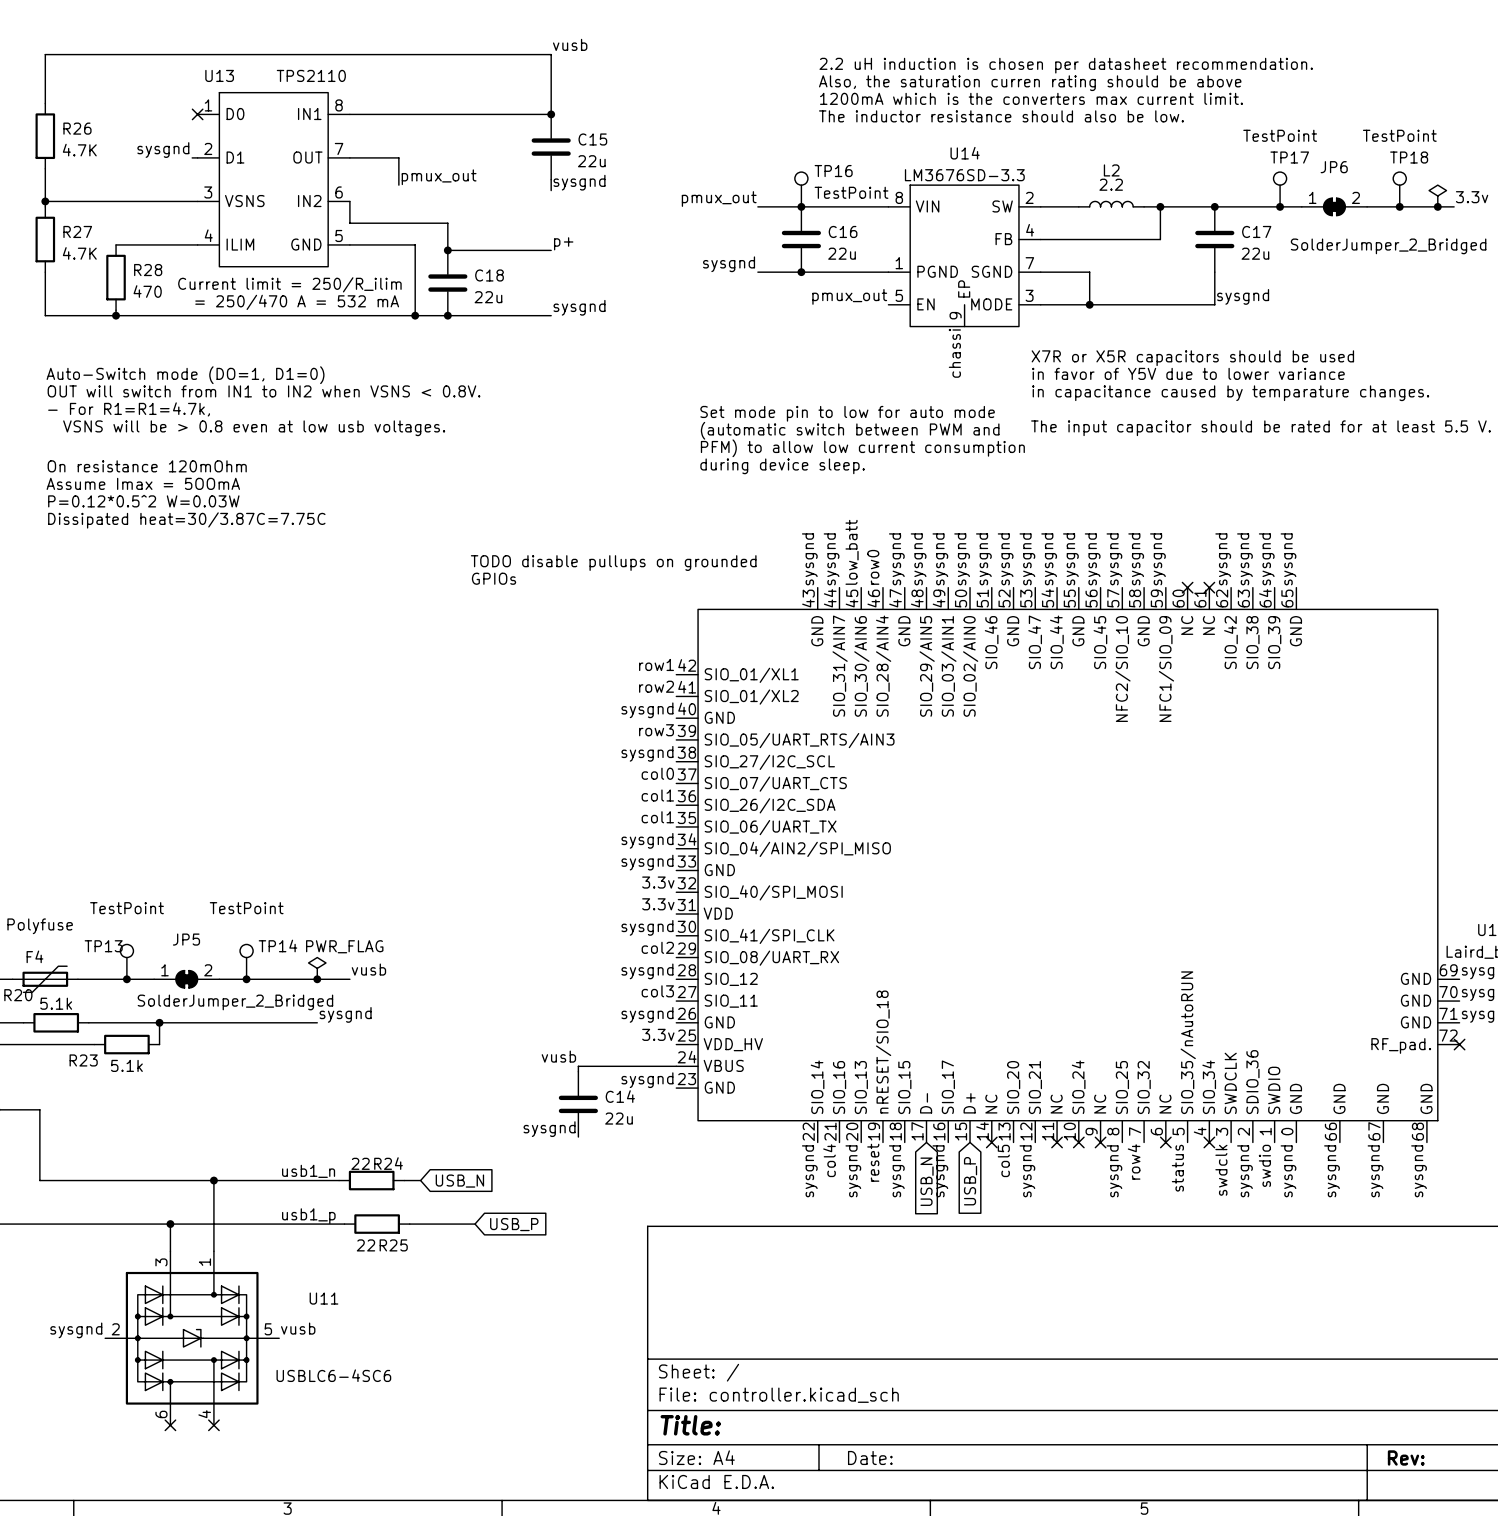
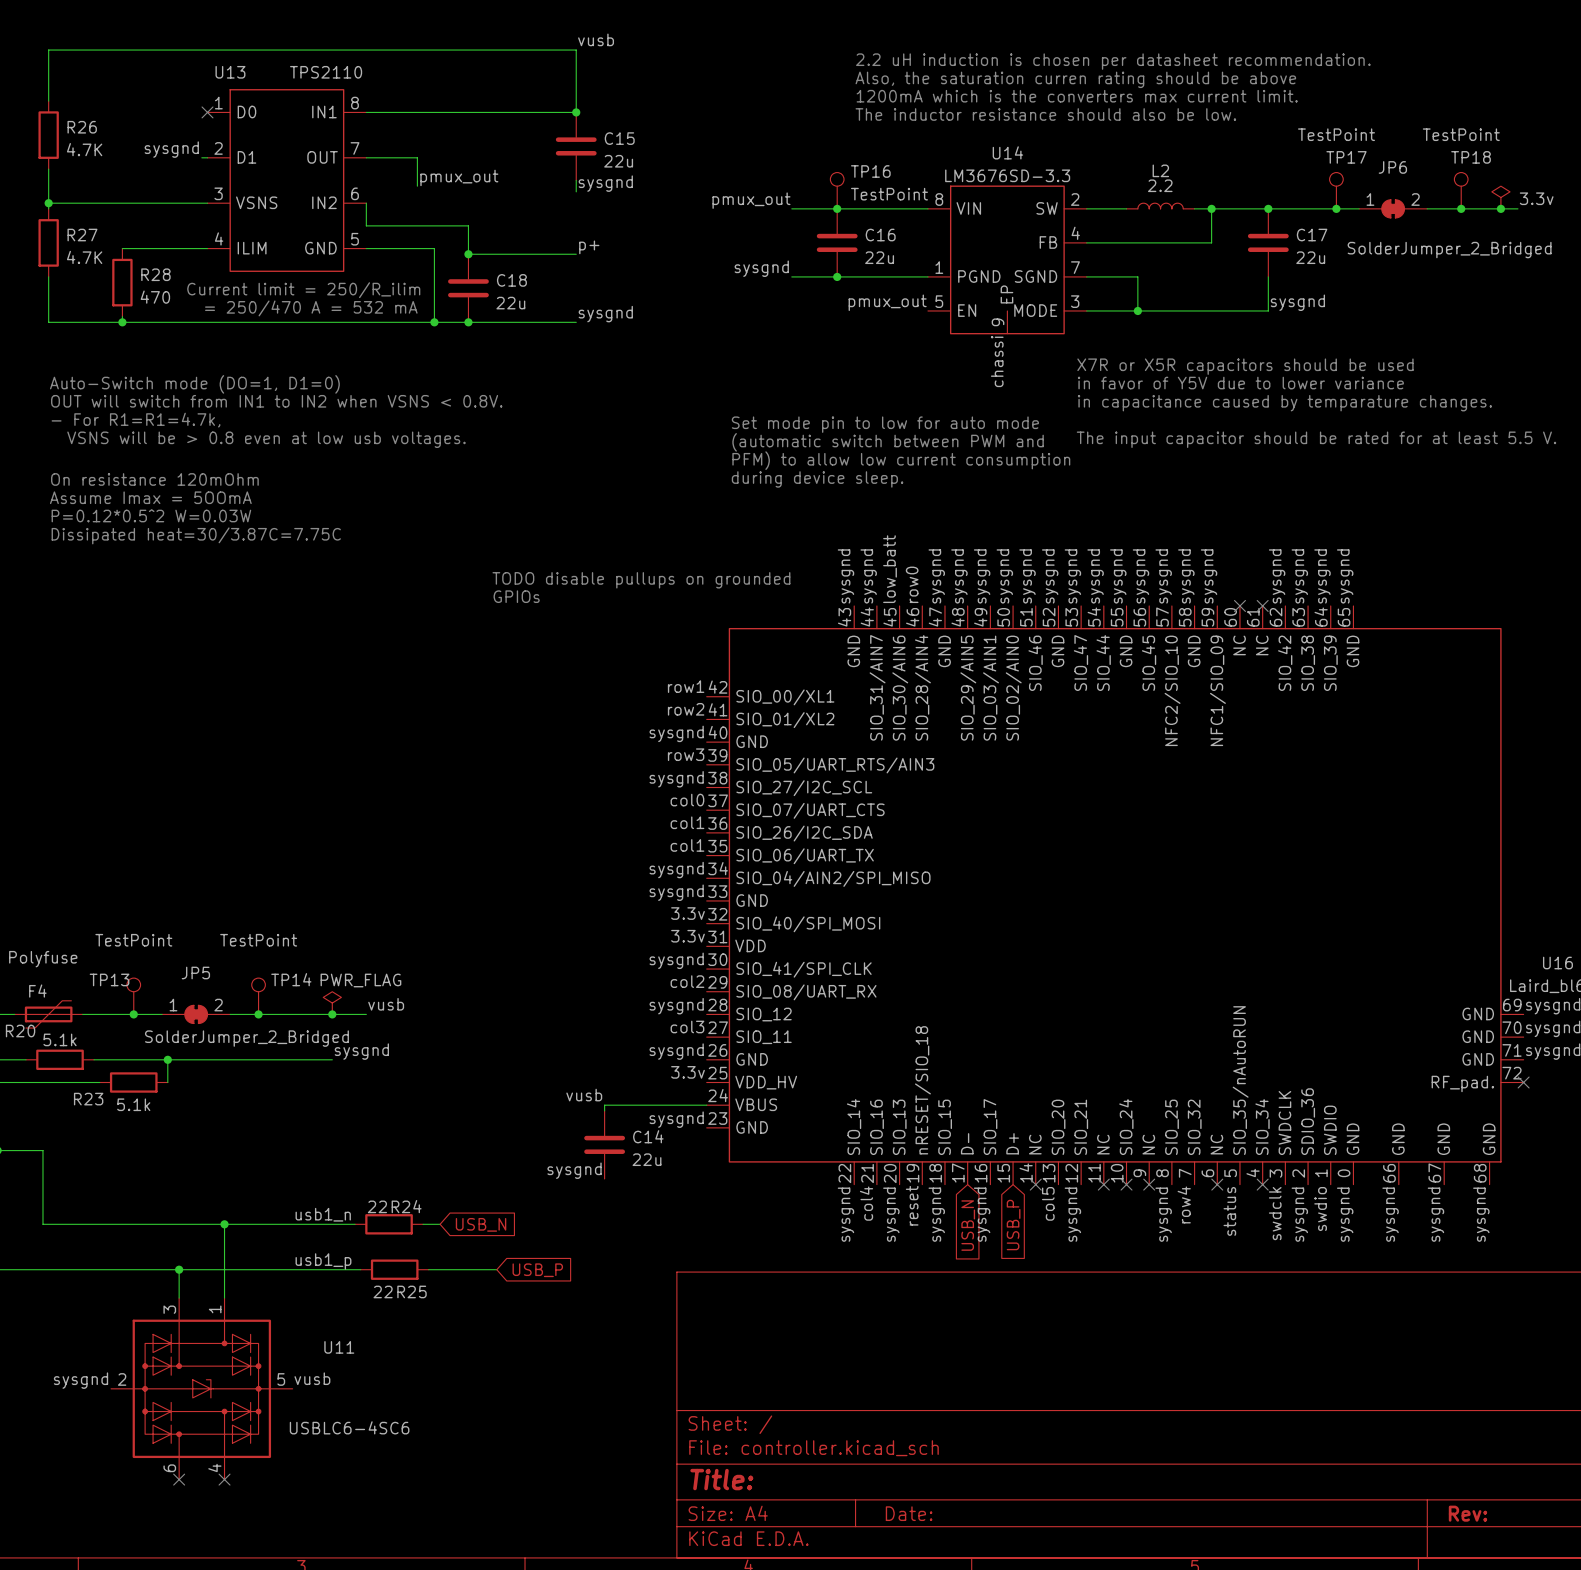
U16 pin name: SIO_01/XL1 (751, 675) -> SIO_00/XL1 (785, 697)

